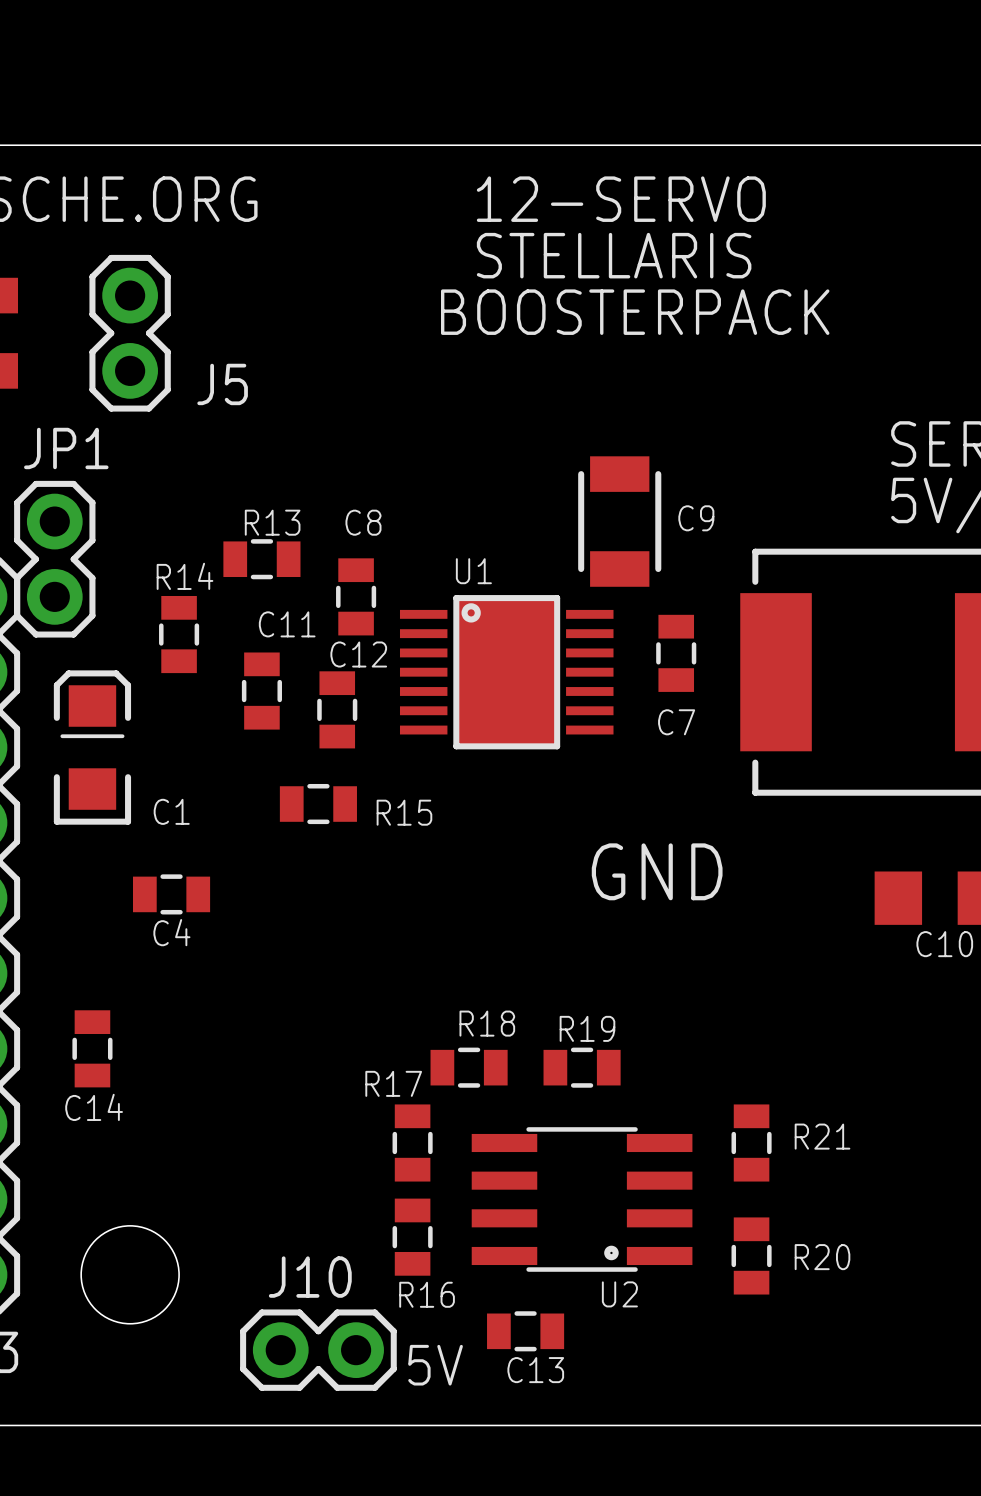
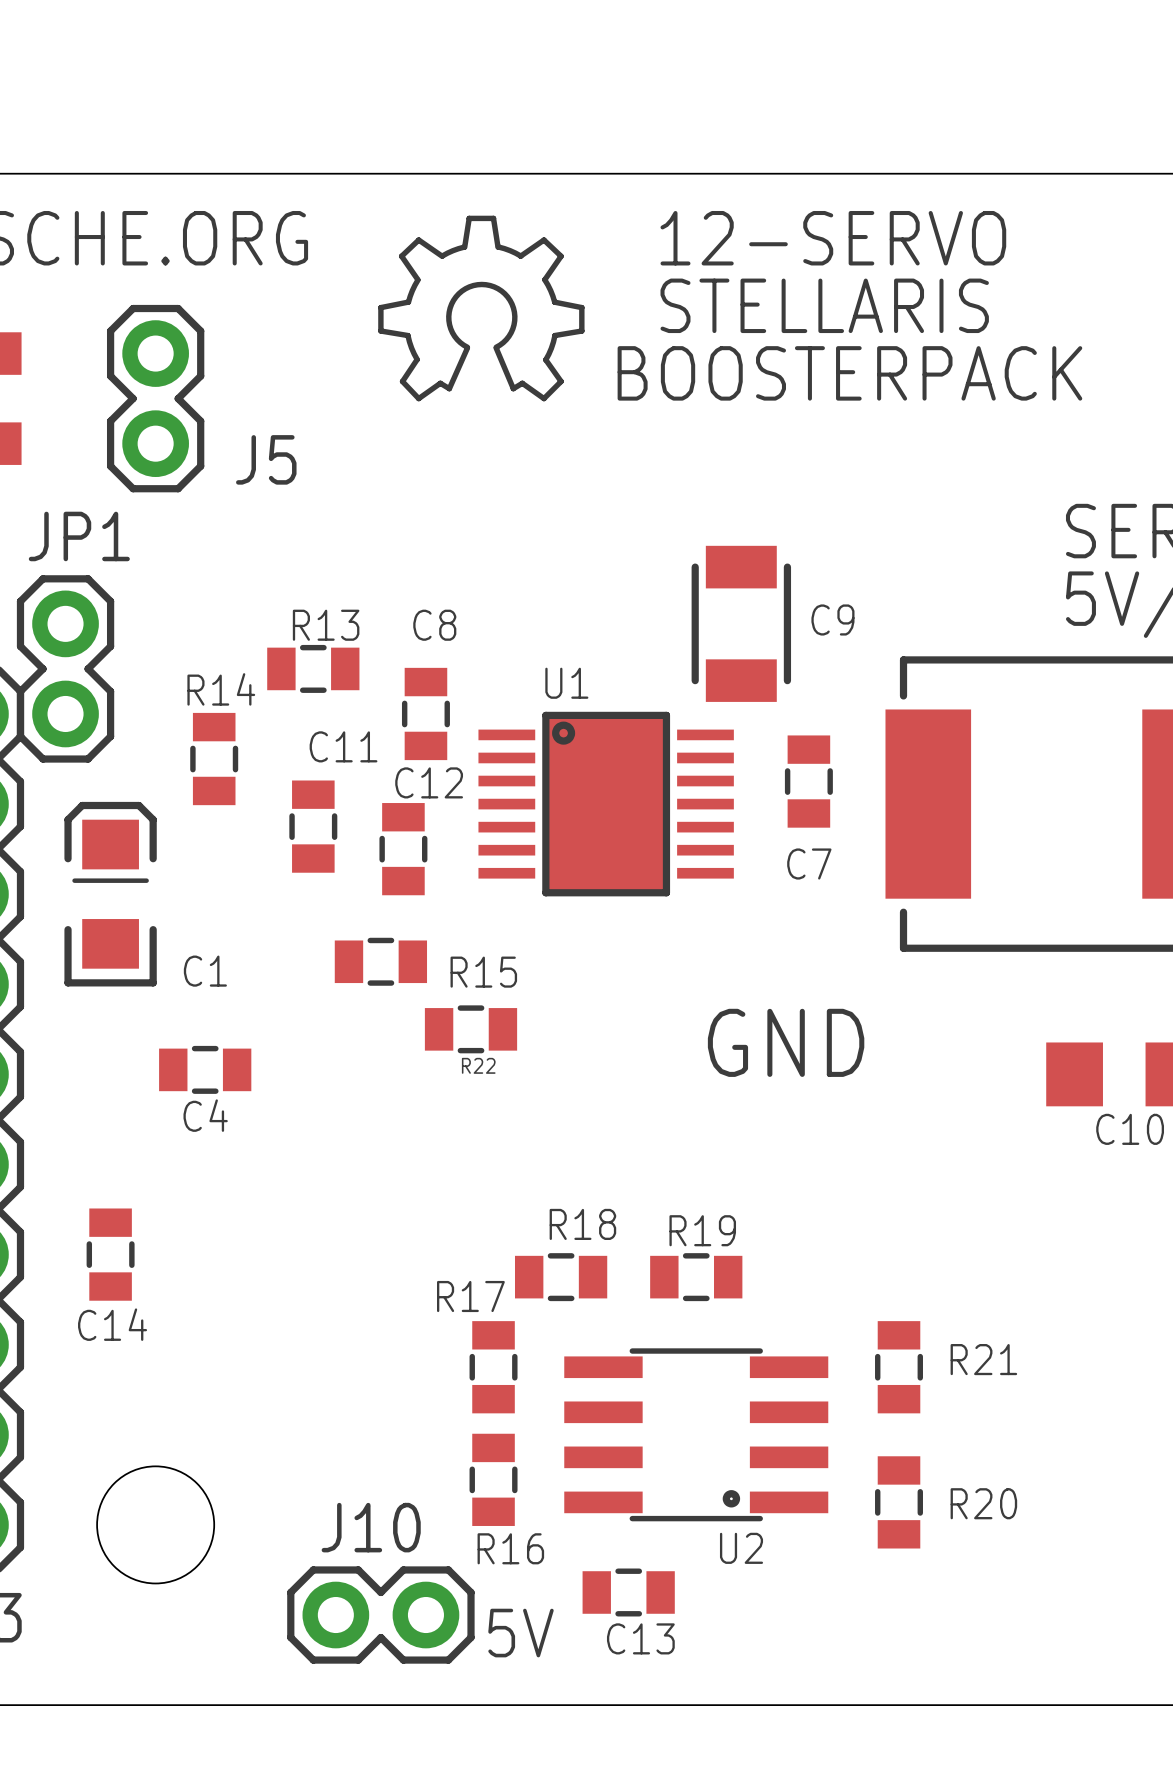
drawing: none -> [378, 215, 585, 402]
text position: 12-SERVO (621, 199) -> 12-SERVO (833, 238)
text position: STELLARIS (614, 255) -> STELLARIS (824, 305)
text position: BOOSTERPACK (635, 312) -> BOOSTERPACK (849, 373)
R22: none -> (471, 1029)

